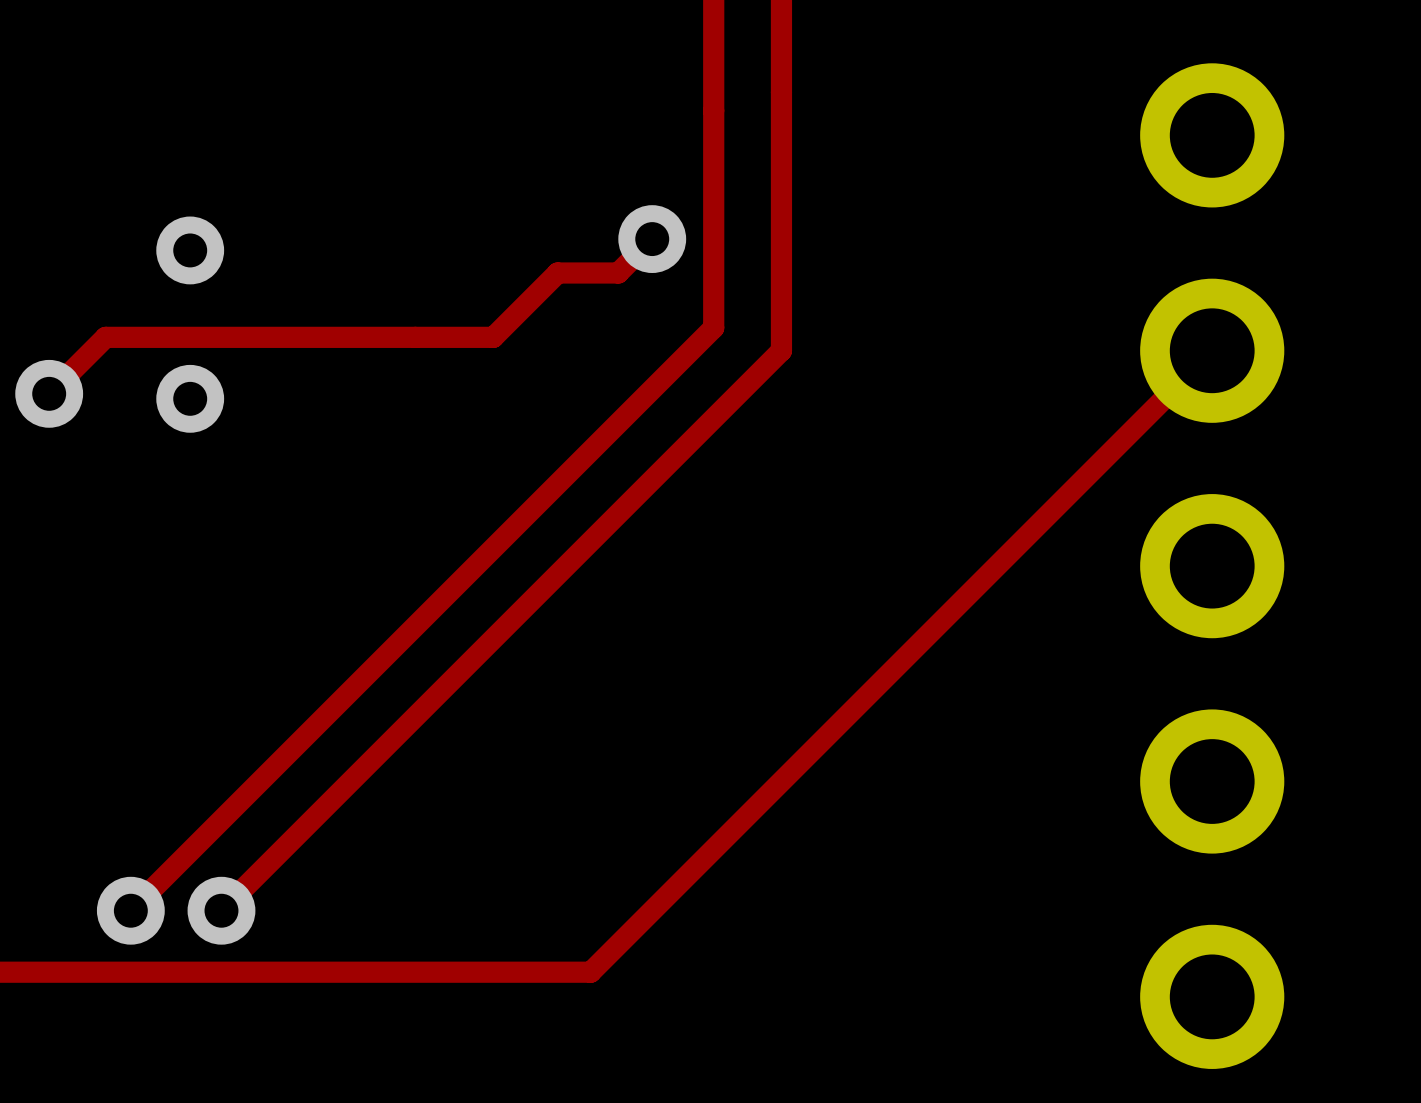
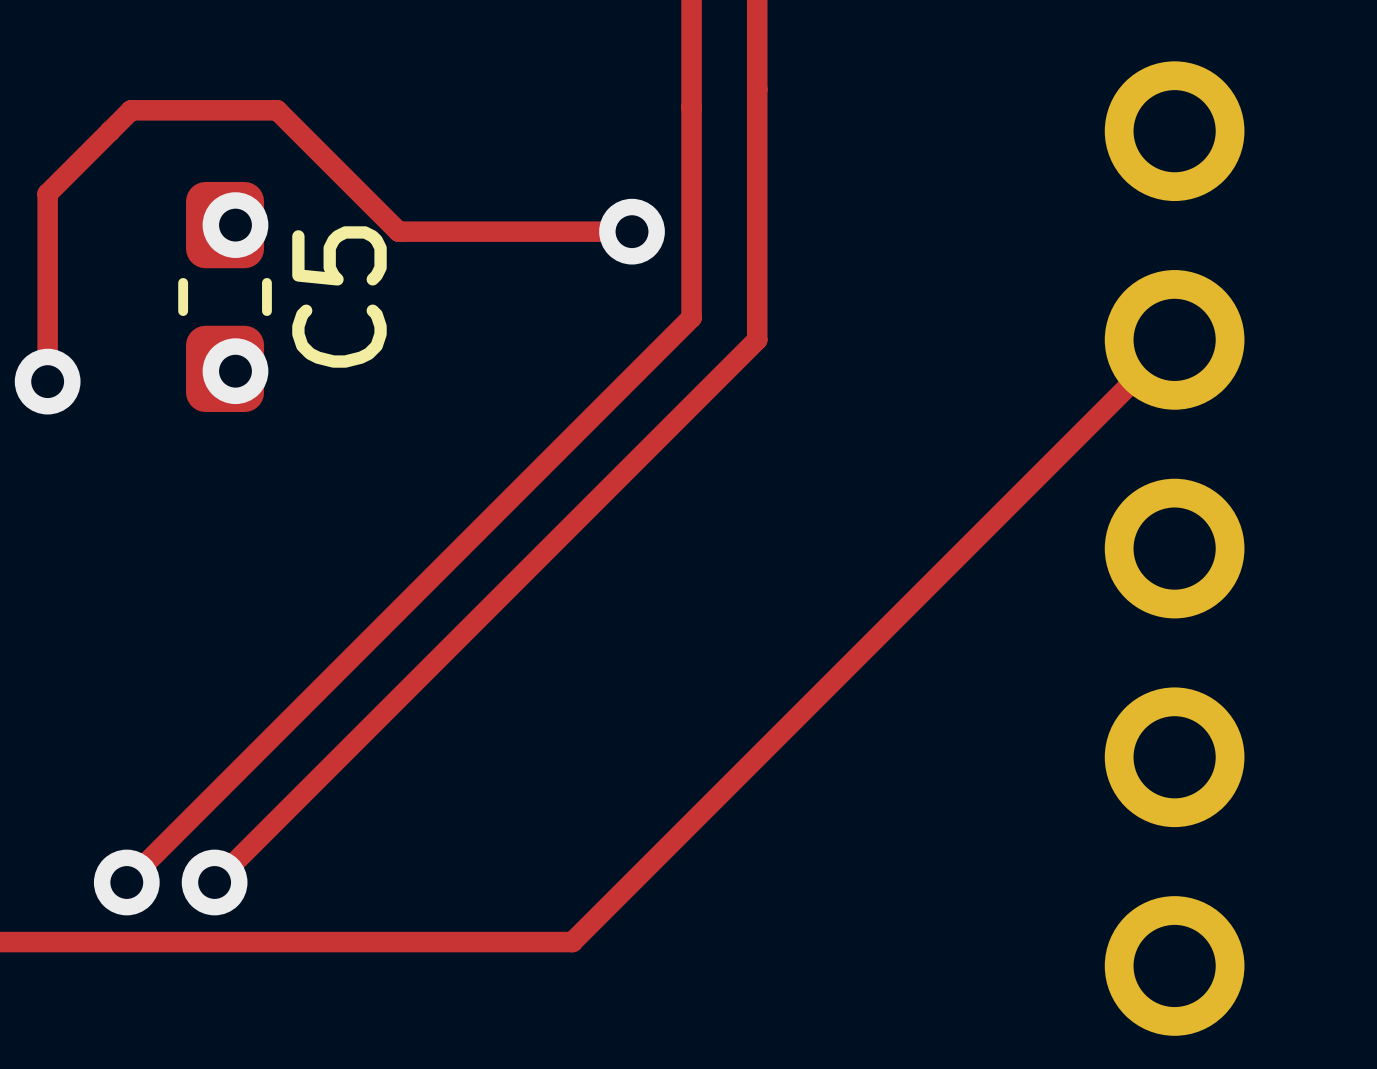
track: (652, 239) (618, 273) (557, 273) (493, 337) (105, 337) (49, 393) -> (632, 231) (398, 231) (277, 110) (131, 110) (47, 193) (47, 381)
via position: (190, 250) -> (235, 225)
C5: none -> (225, 296)
via position: (190, 398) -> (235, 371)

